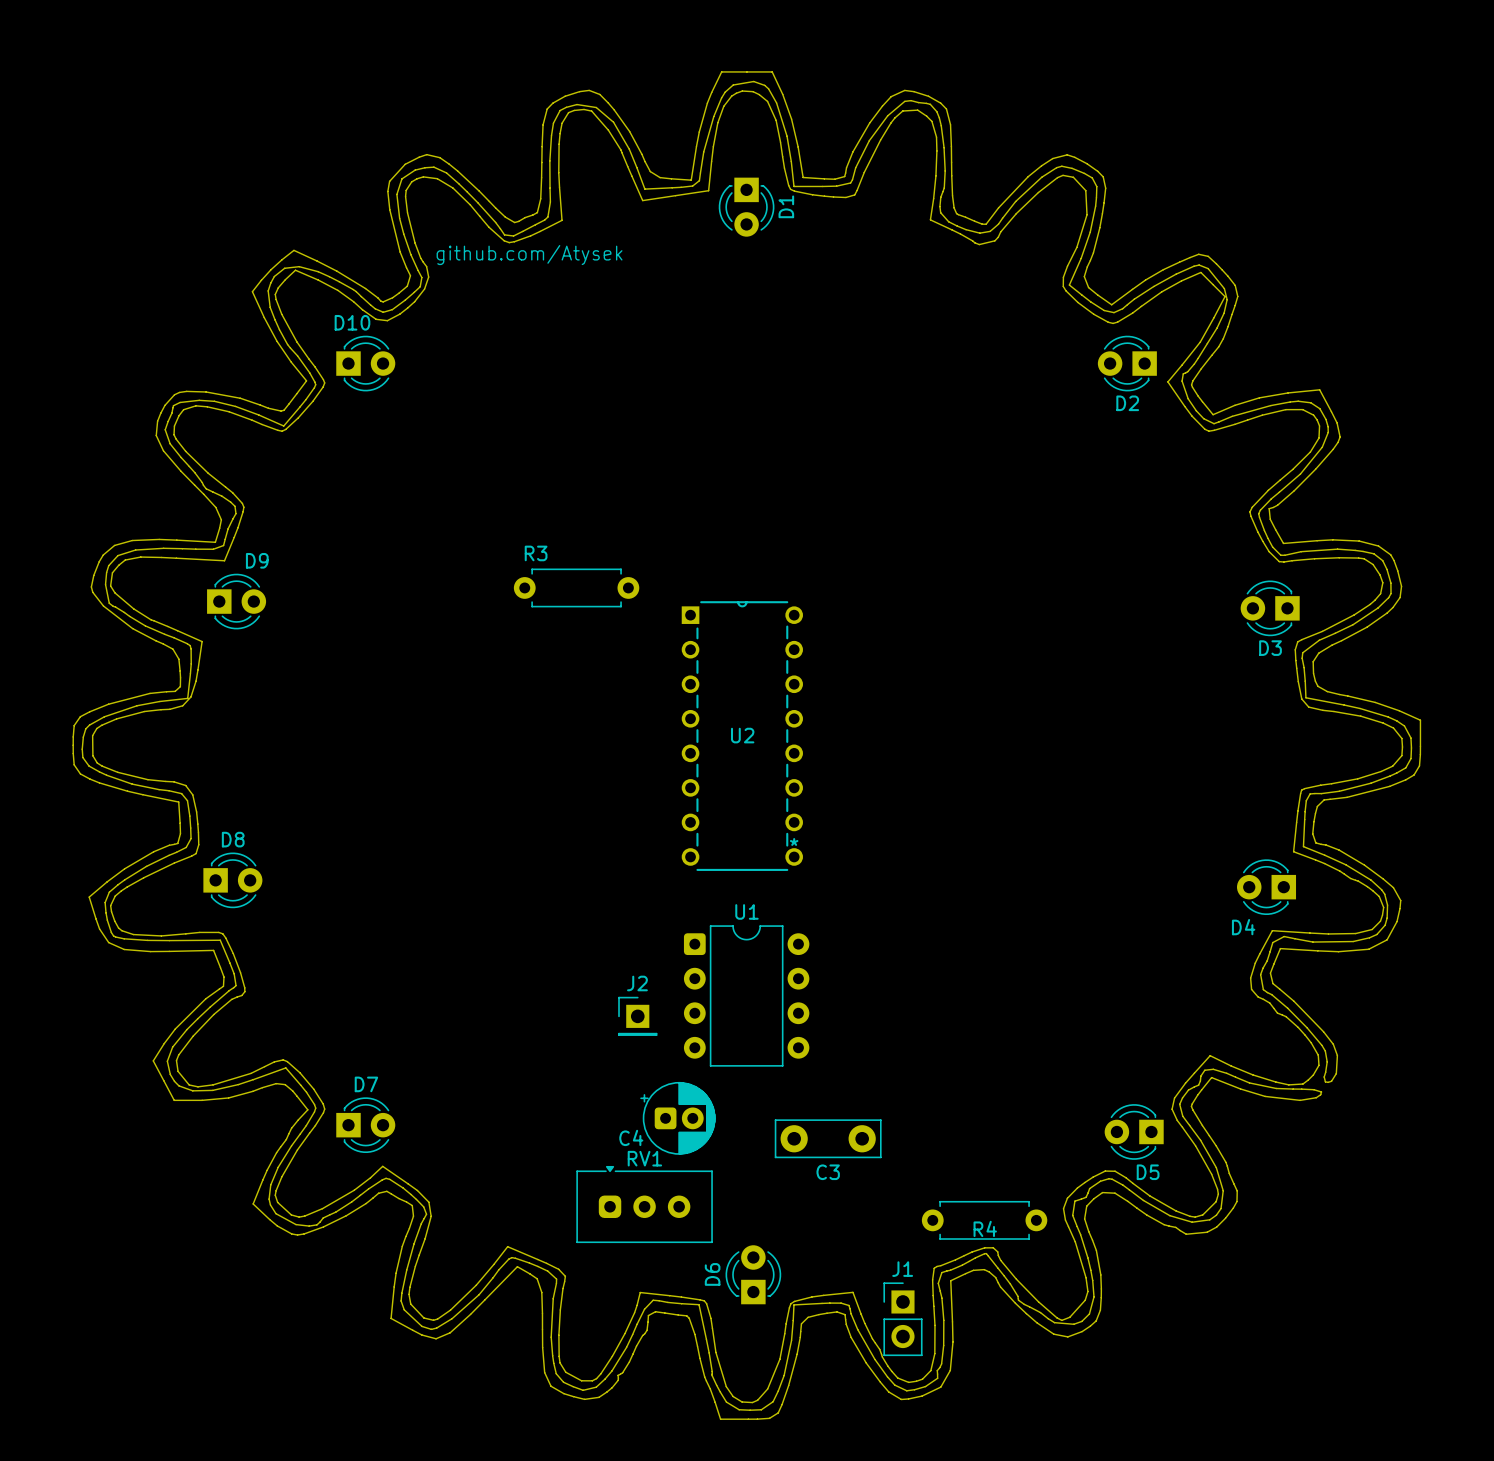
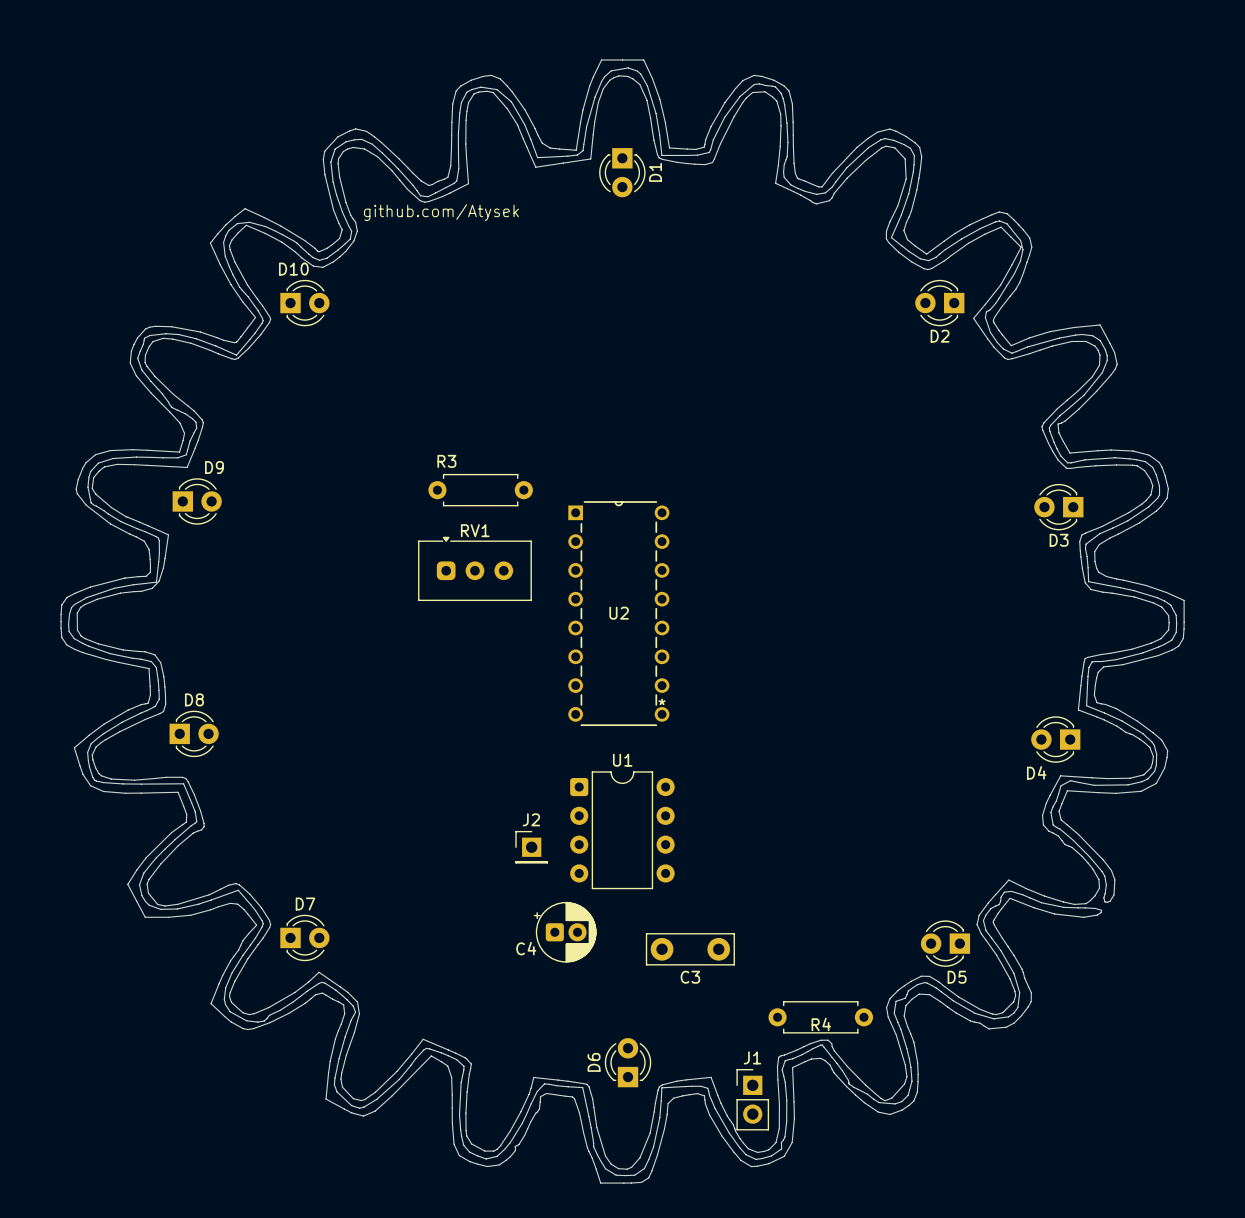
RV1 position: (644, 1204) -> (474, 568)

